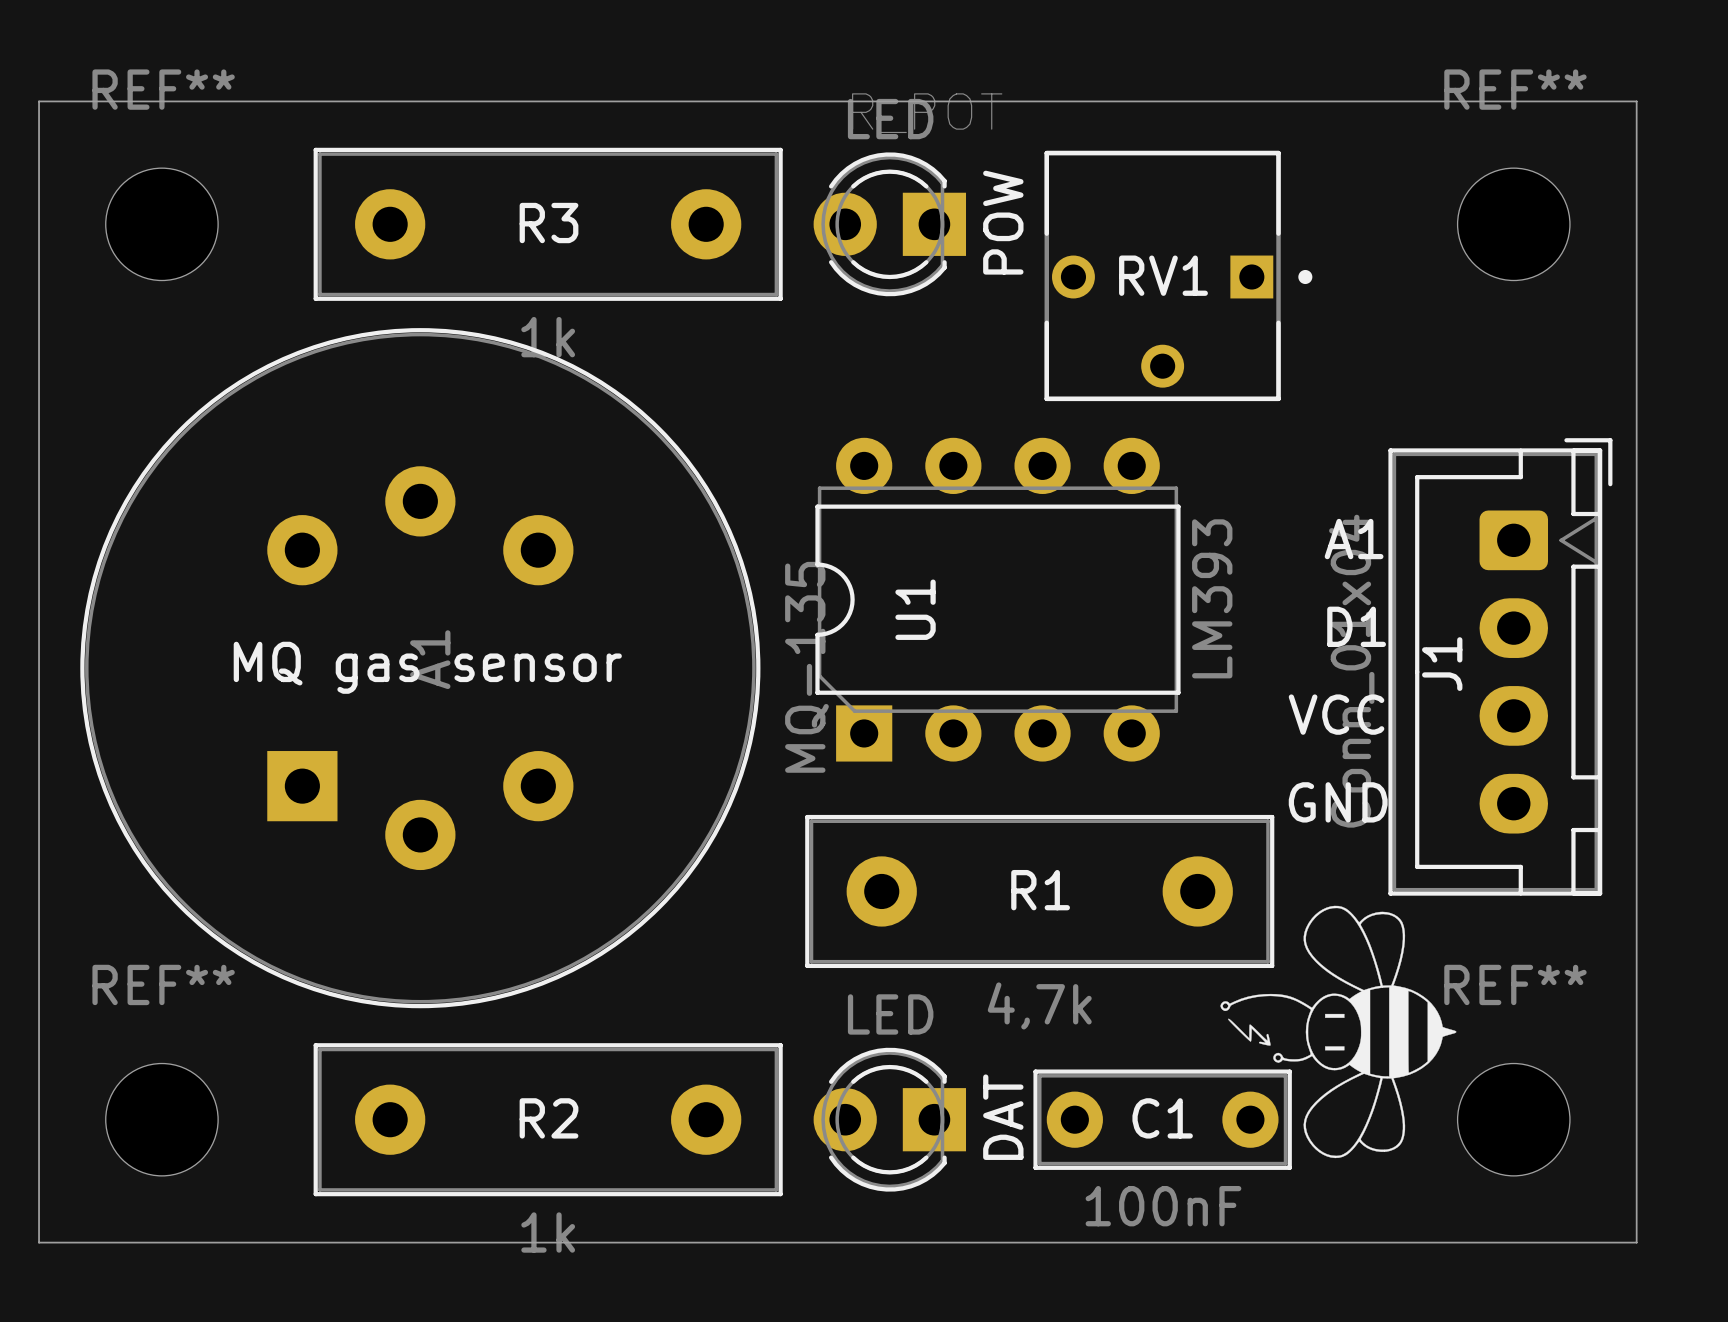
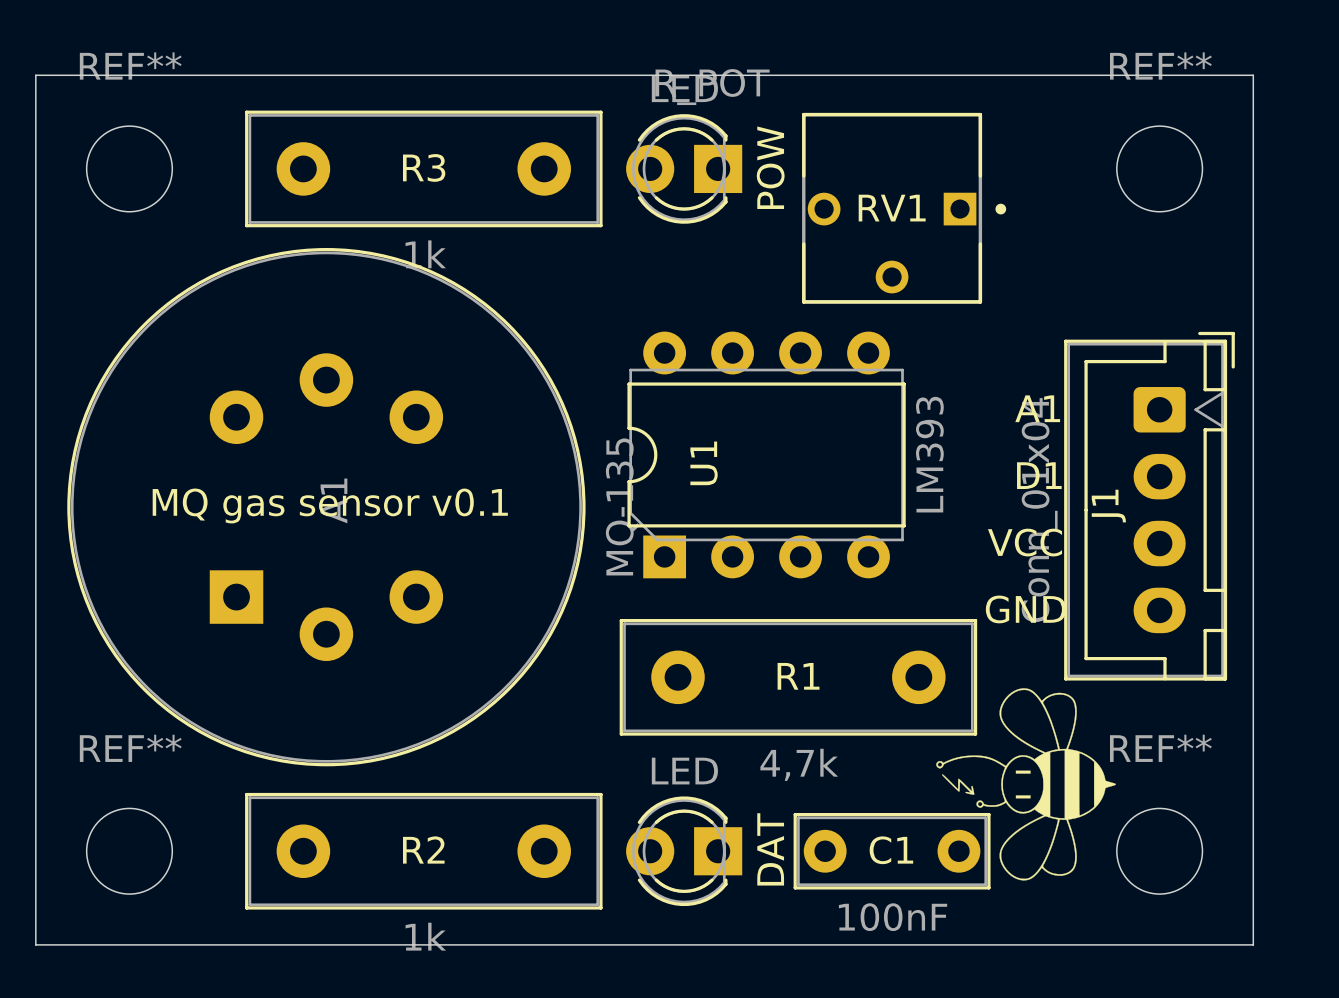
text: MQ gas sensor (427, 667) -> MQ gas sensor v0.1 (330, 505)

